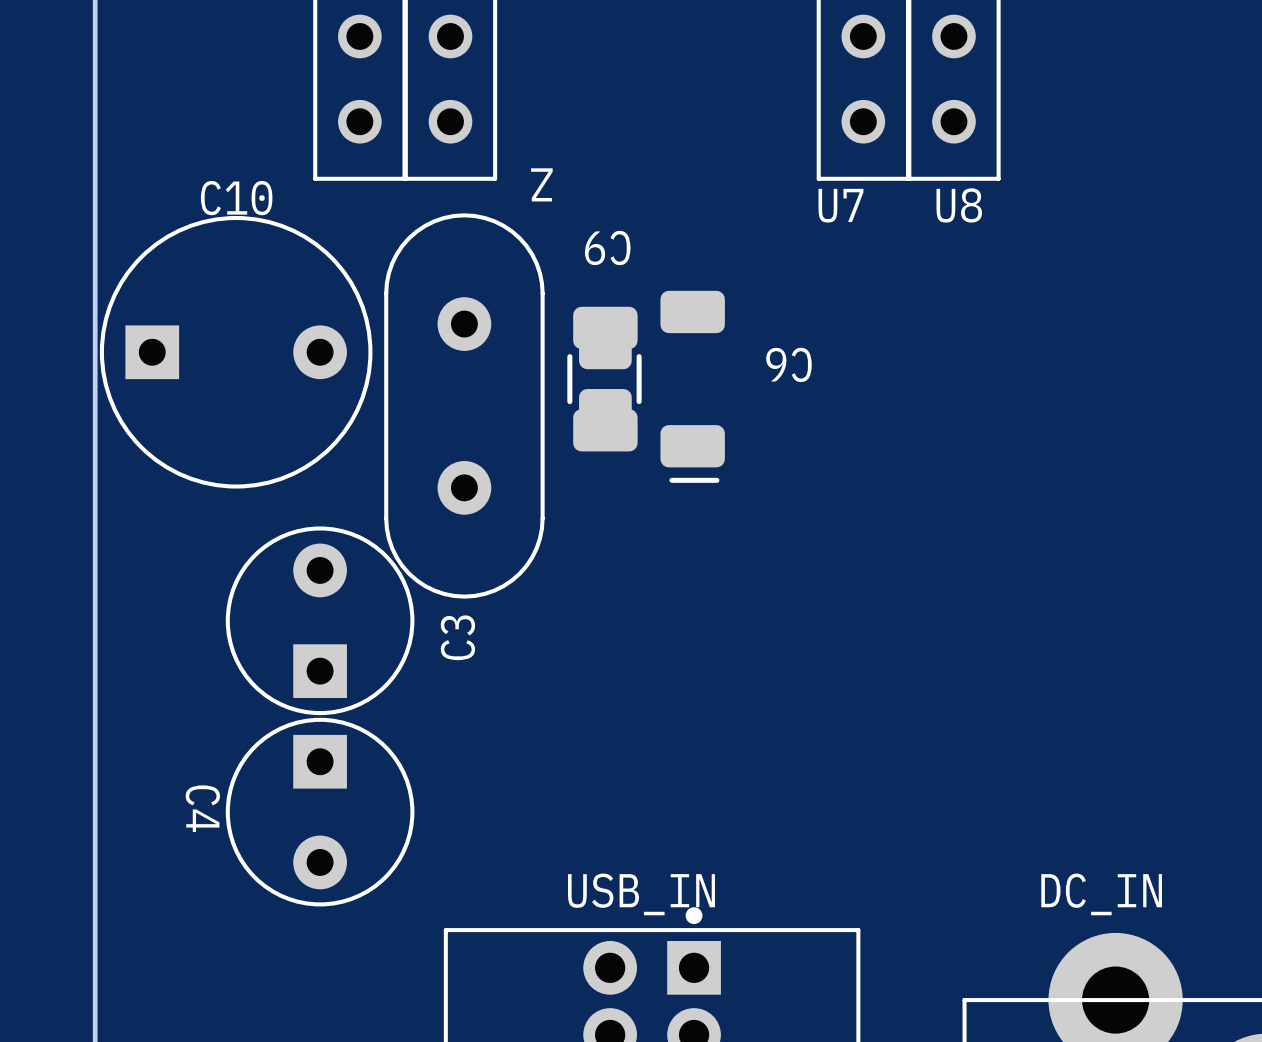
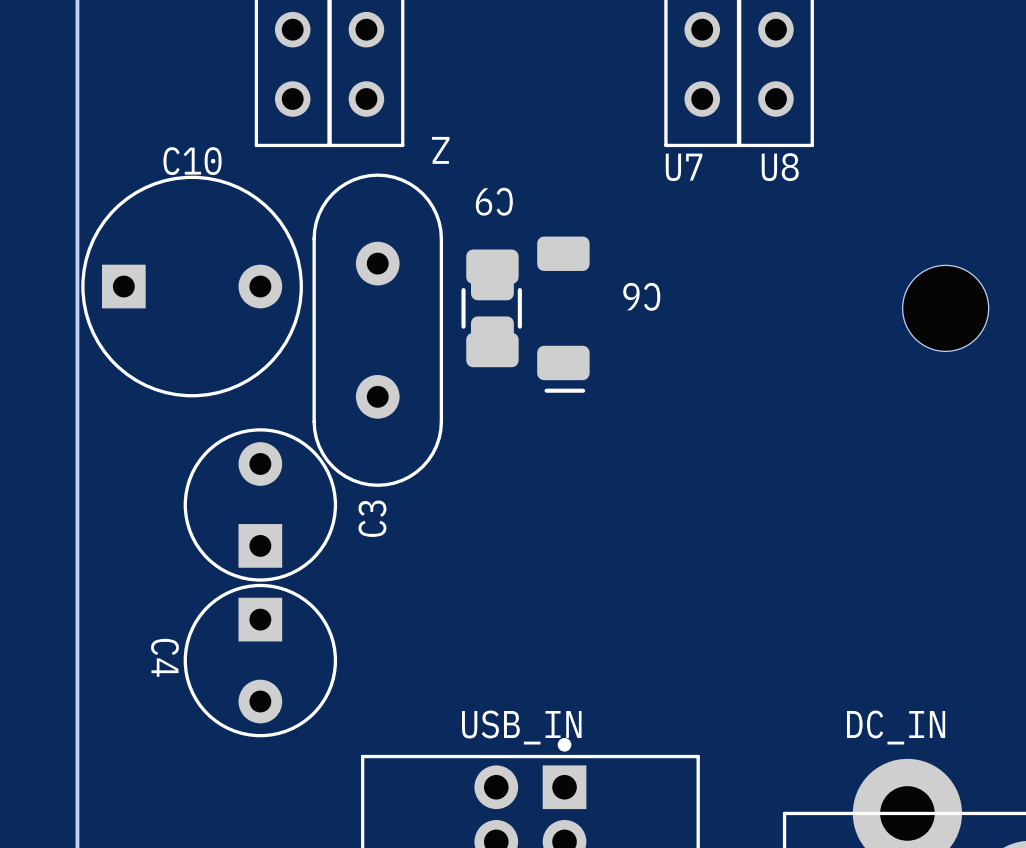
hole: none -> (945, 308)

